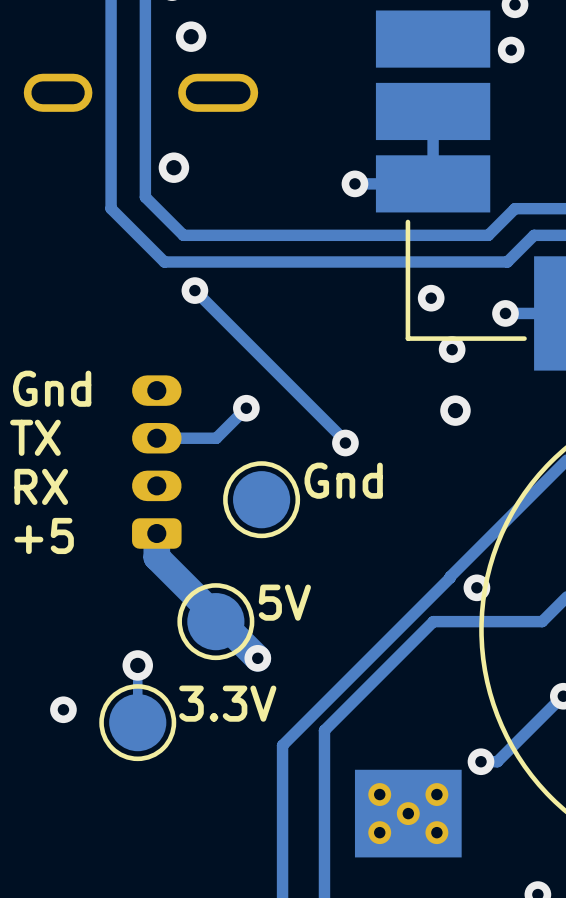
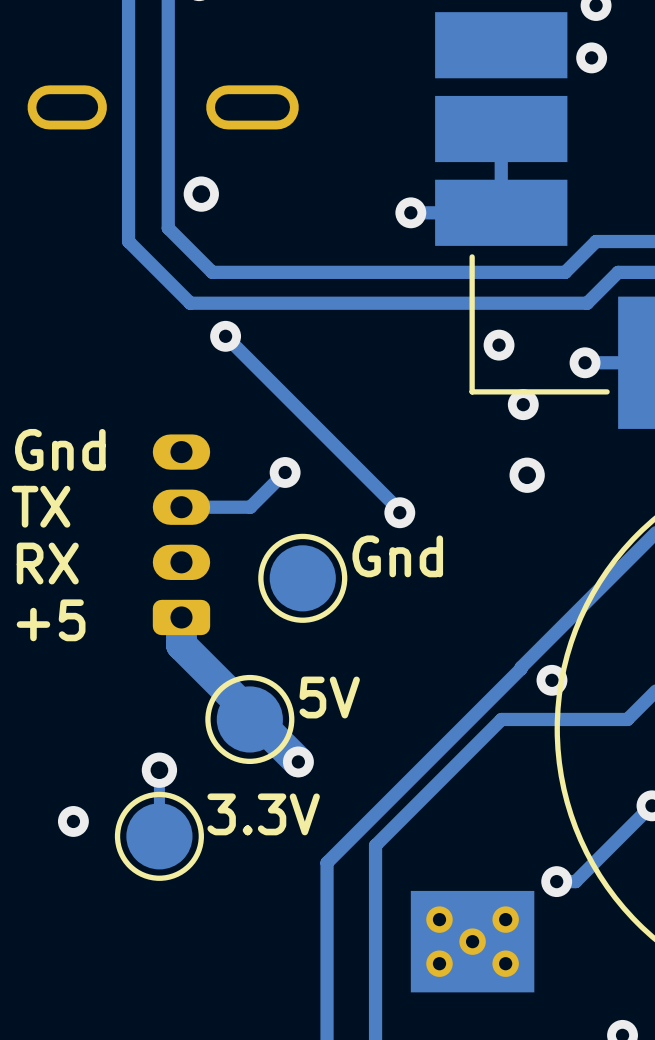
via: (191, 36) -> none

